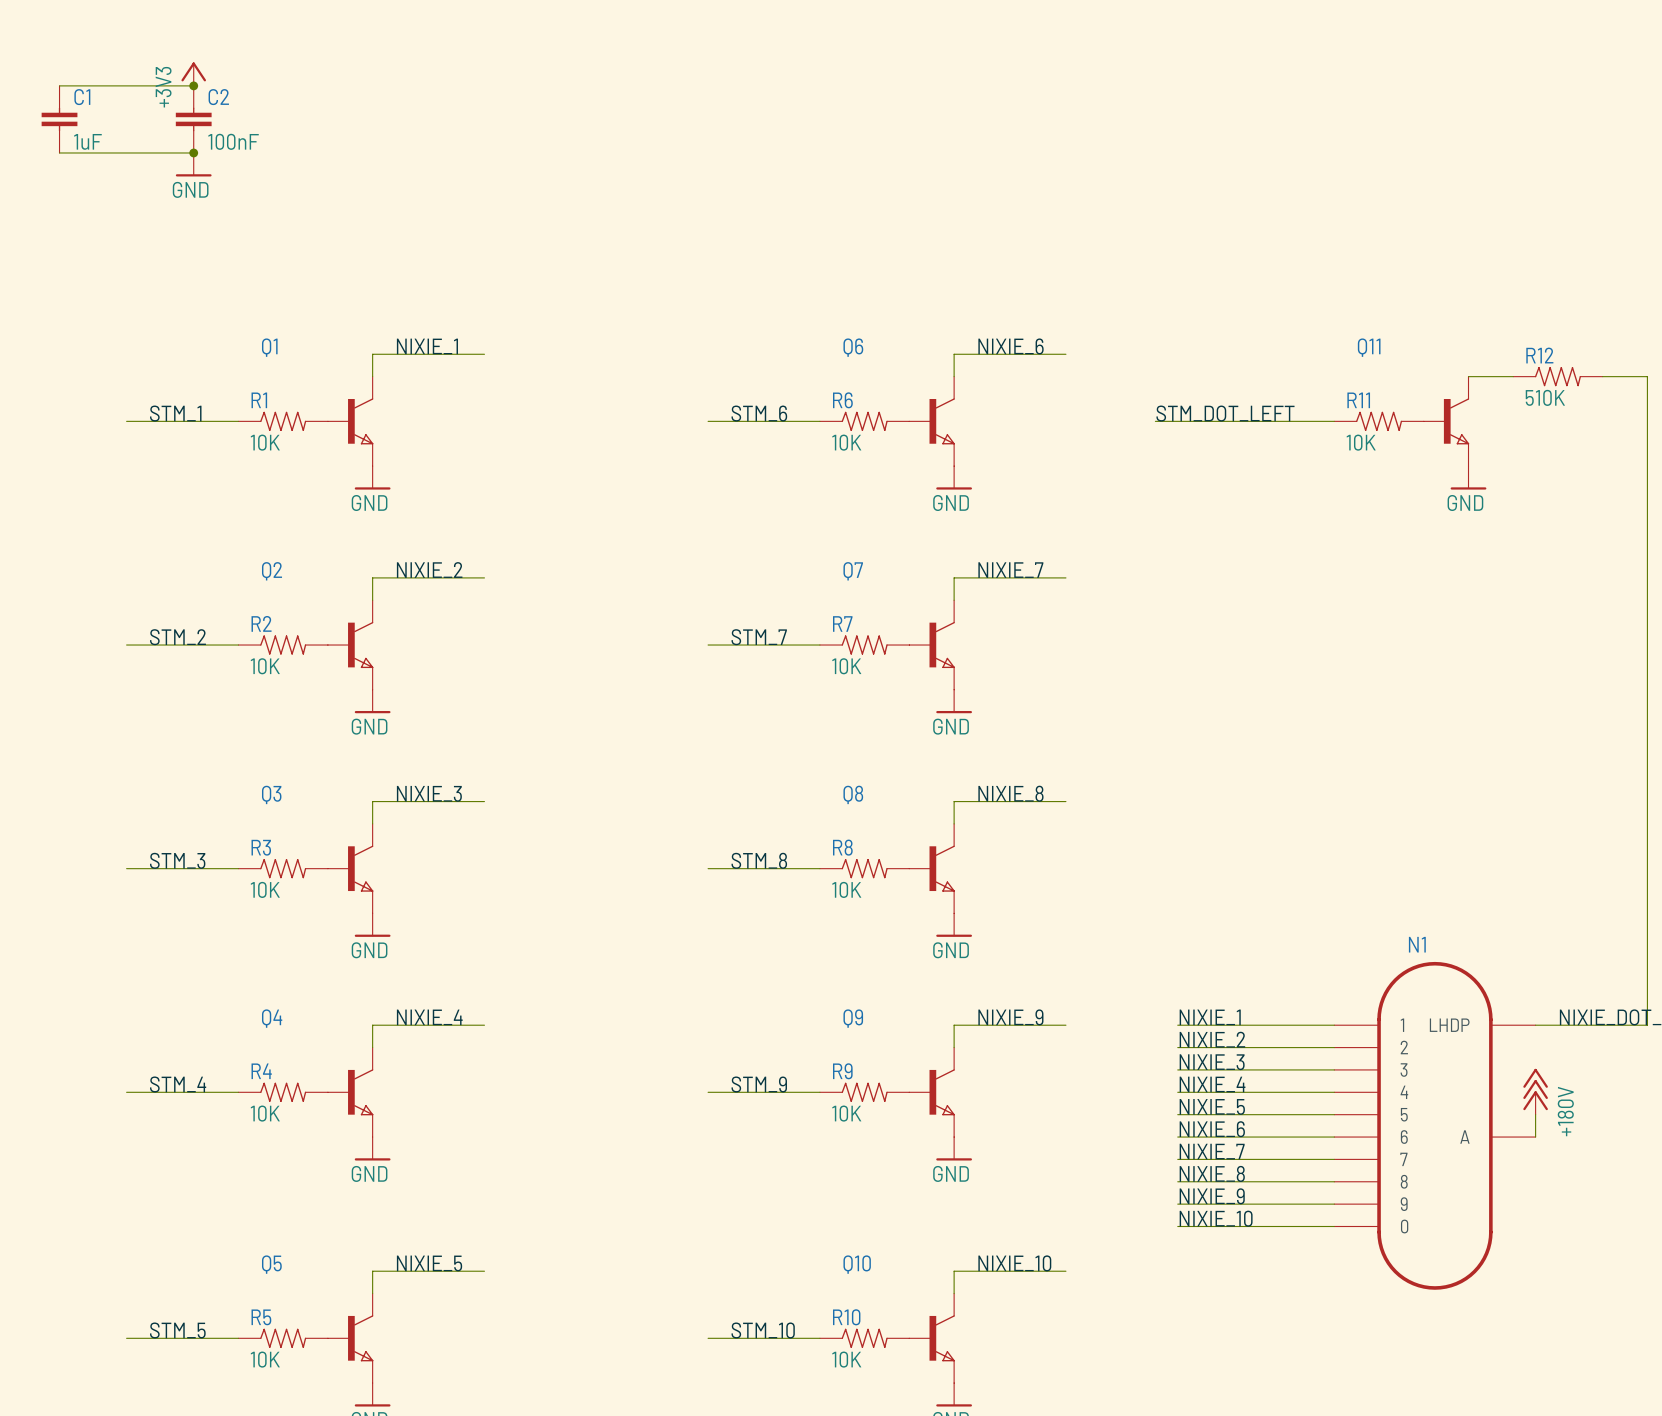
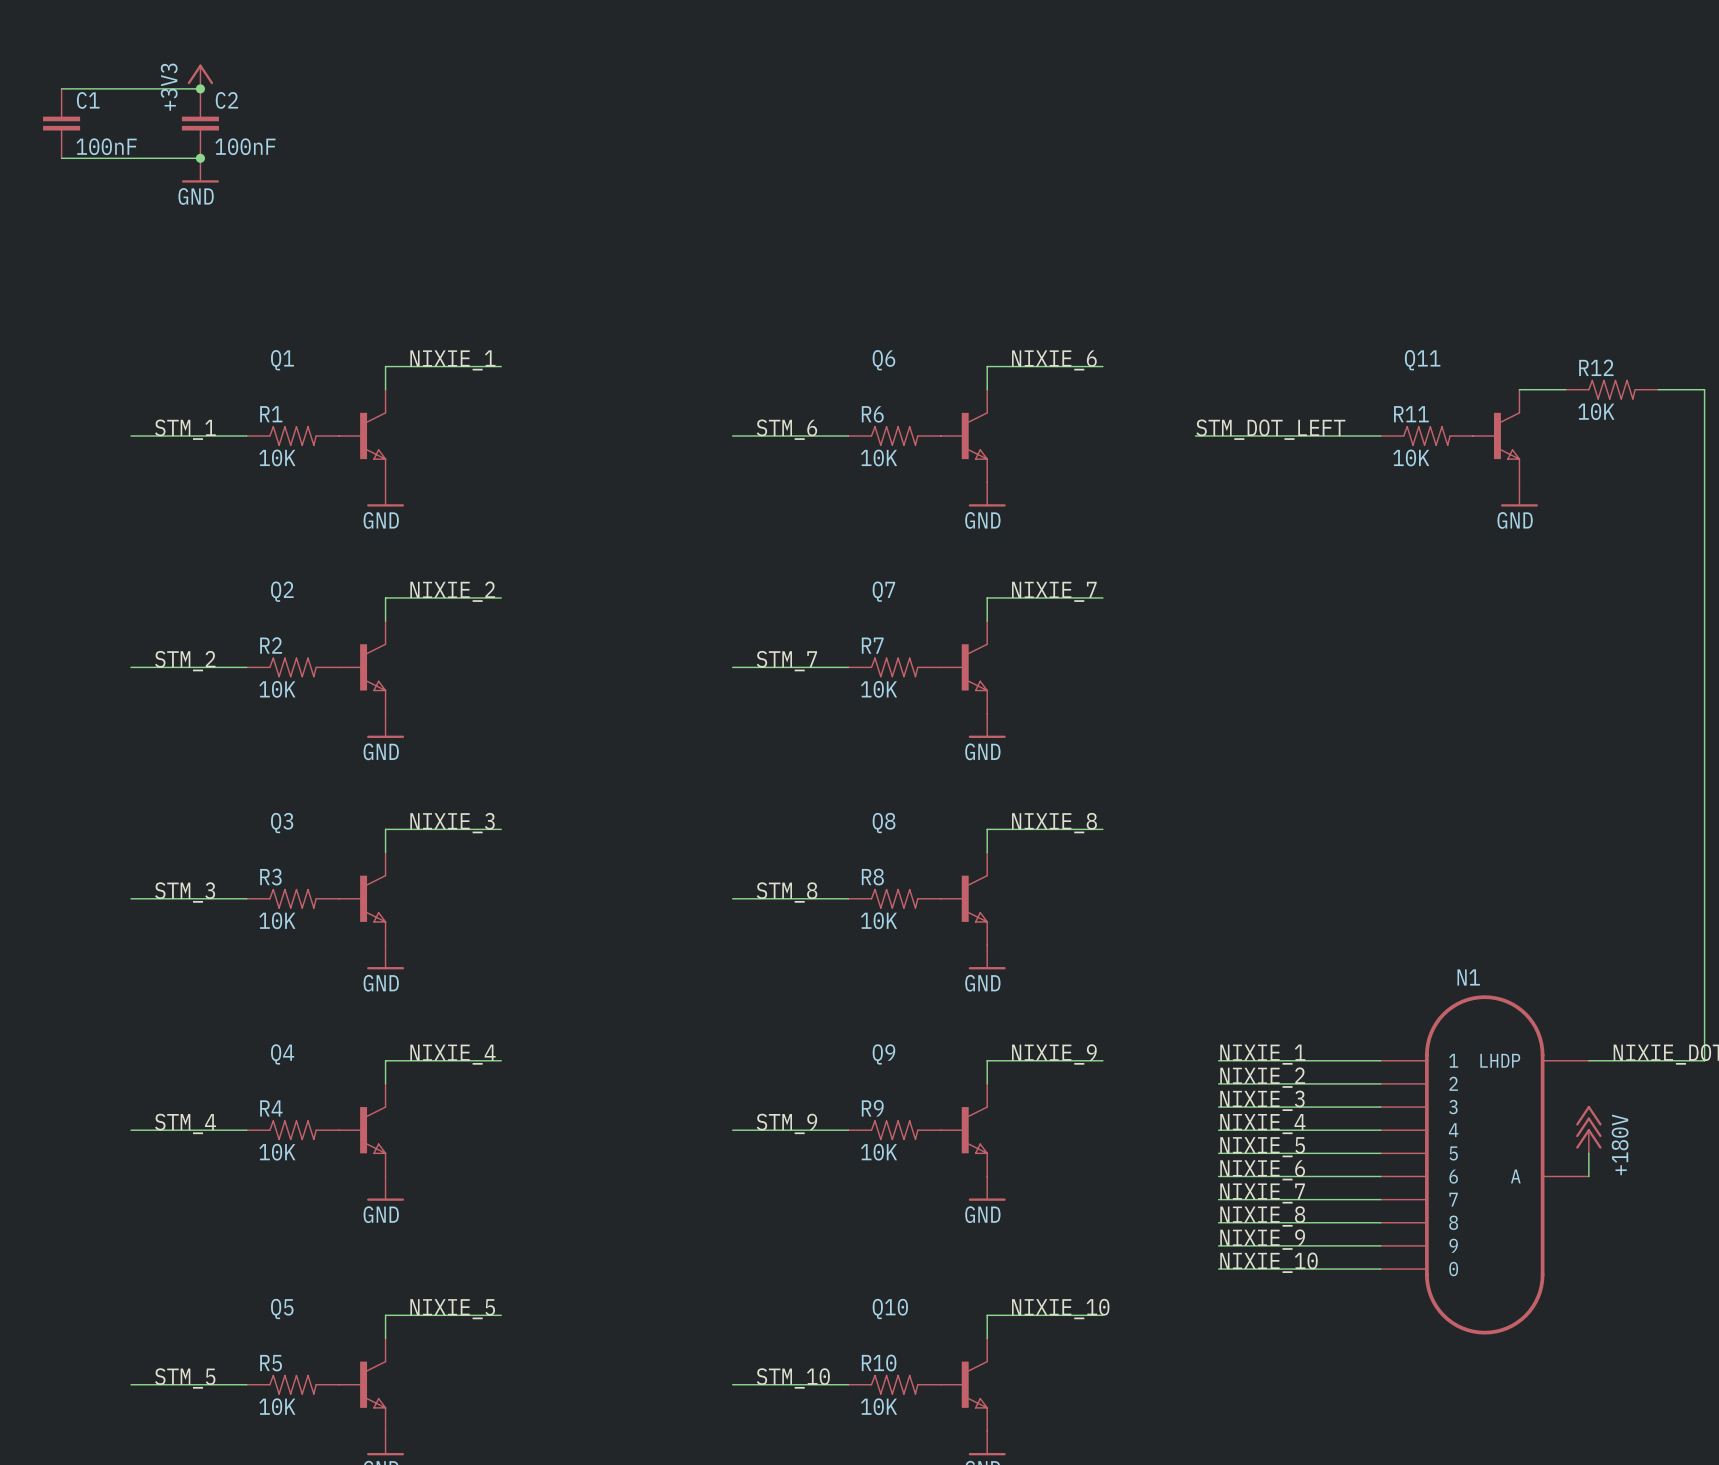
C1 value: 1uF (87, 141) -> 100nF (106, 146)
R12 value: 510K (1545, 397) -> 10K (1596, 411)

